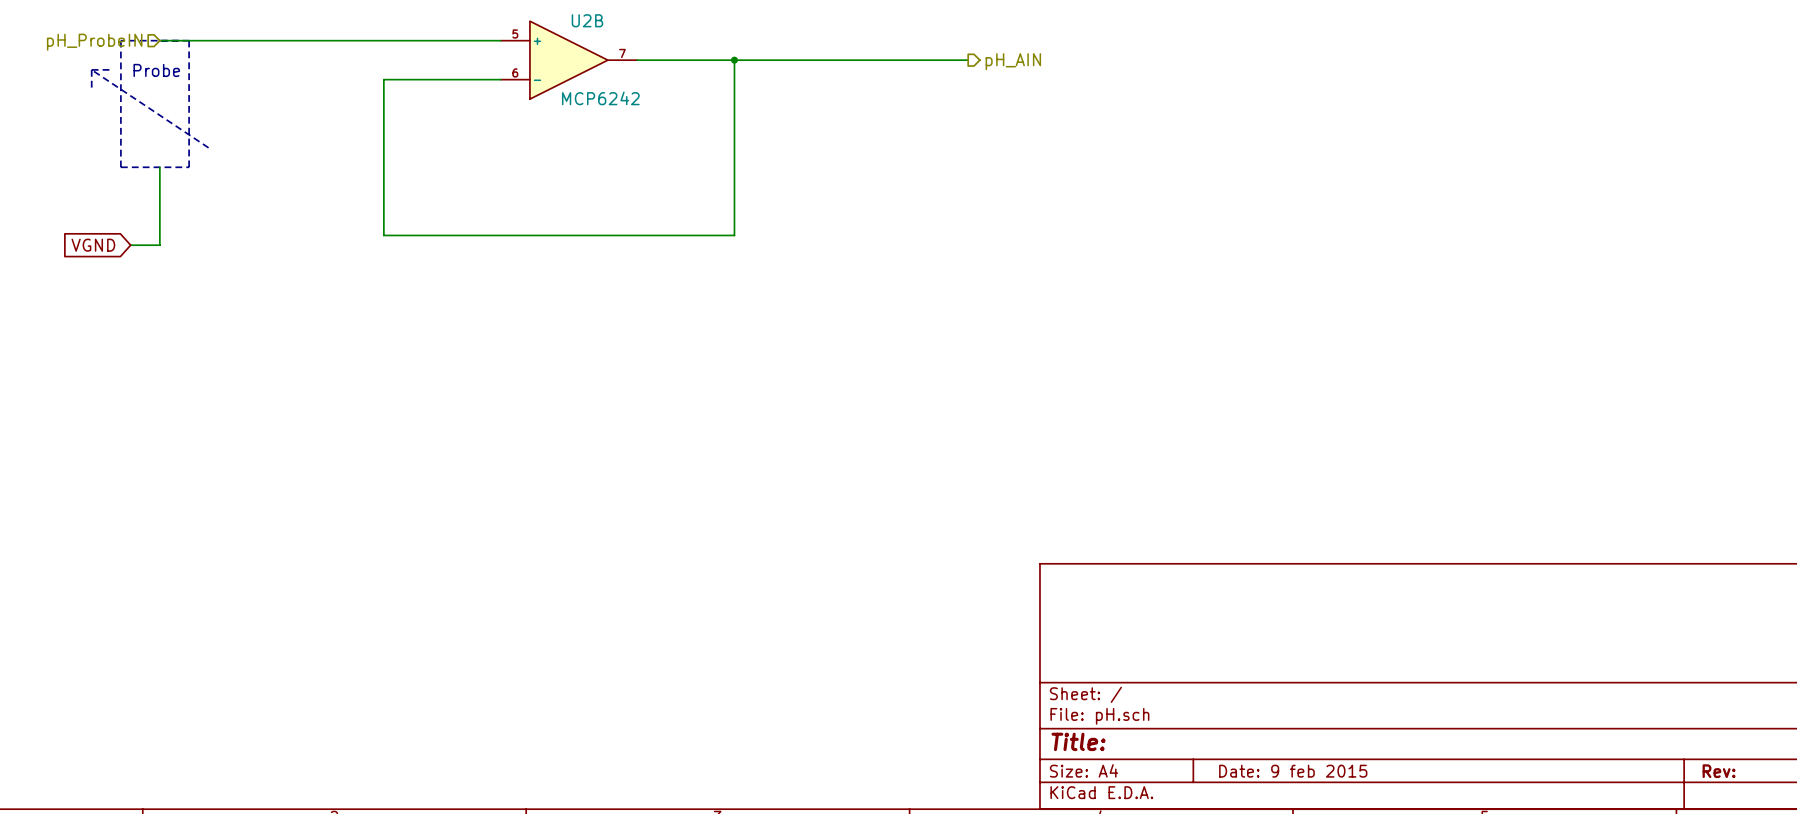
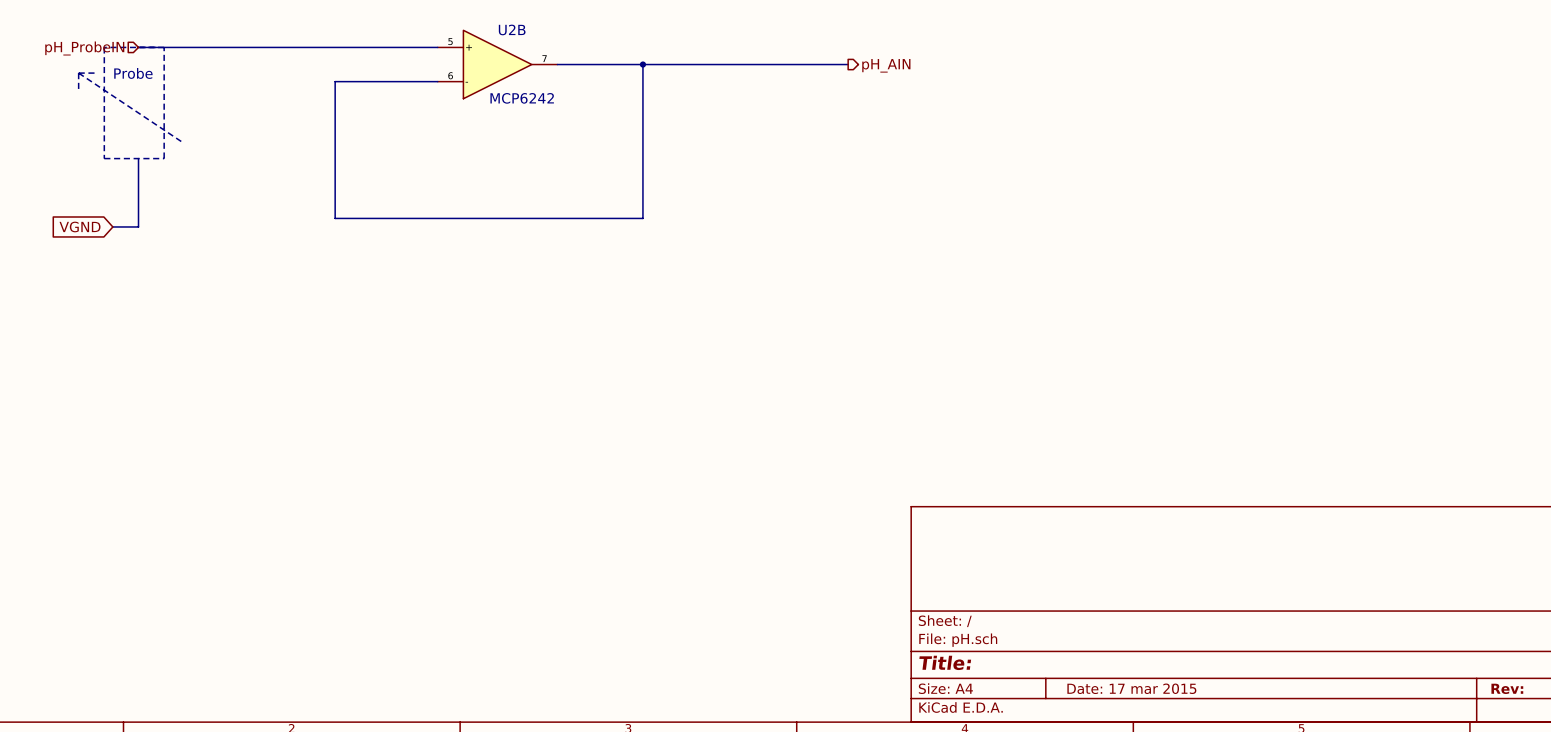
title block: Date: 9 feb 2015 (1293, 771) -> Date: 17 mar 2015 (1131, 688)

